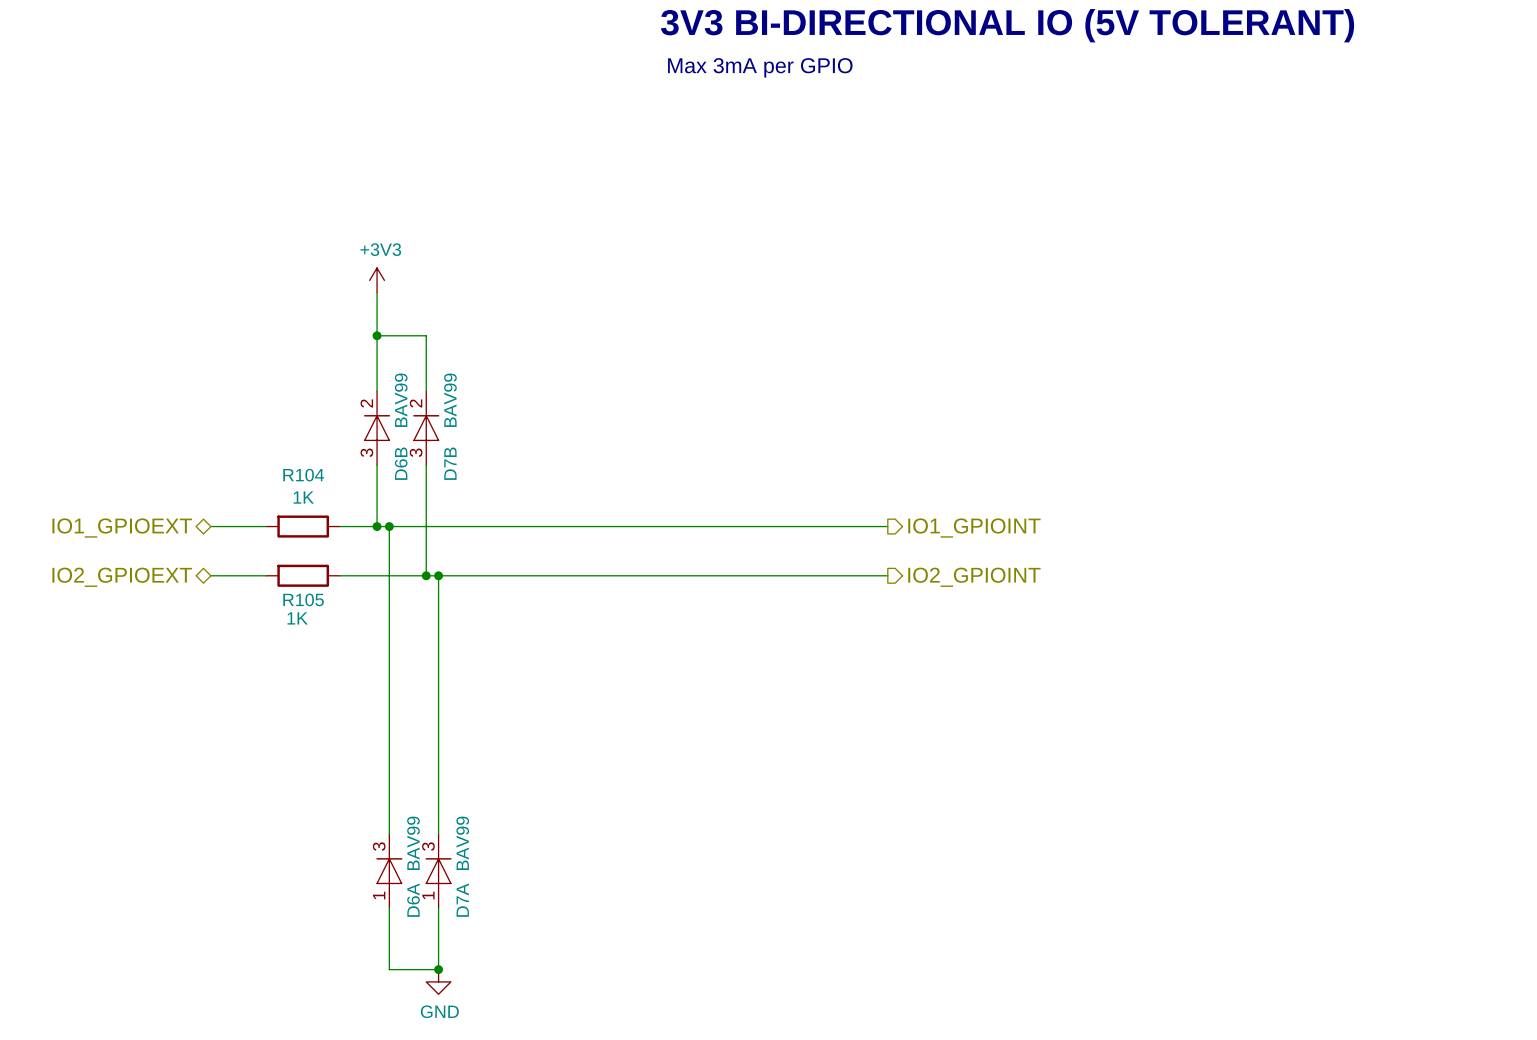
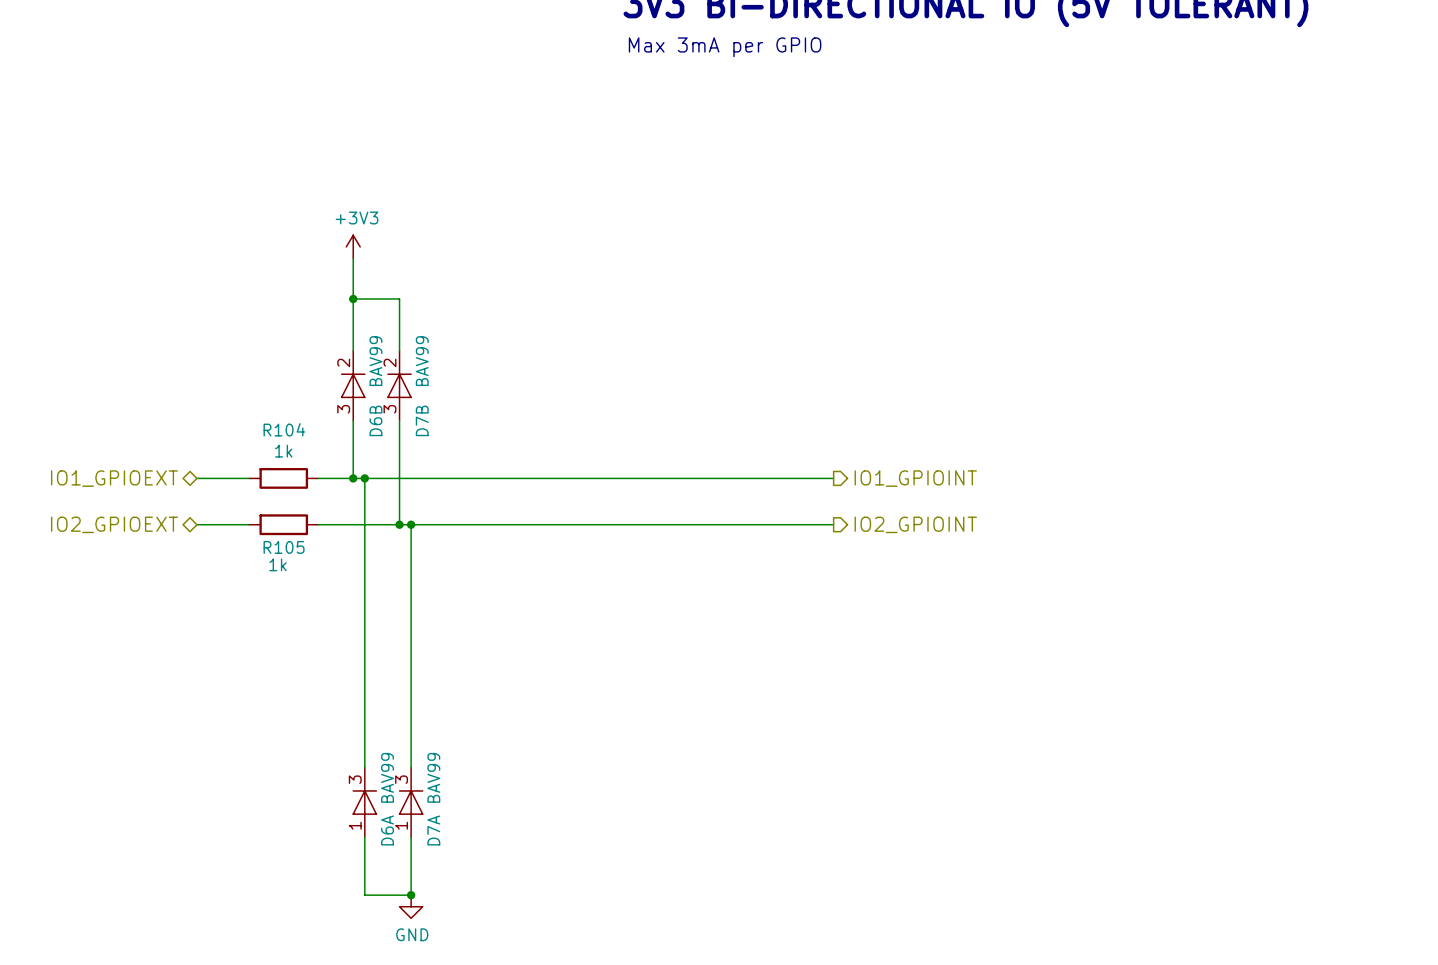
R104 value: 1K (303, 497) -> 1k (283, 451)
R105 value: 1K (297, 618) -> 1k (277, 564)

